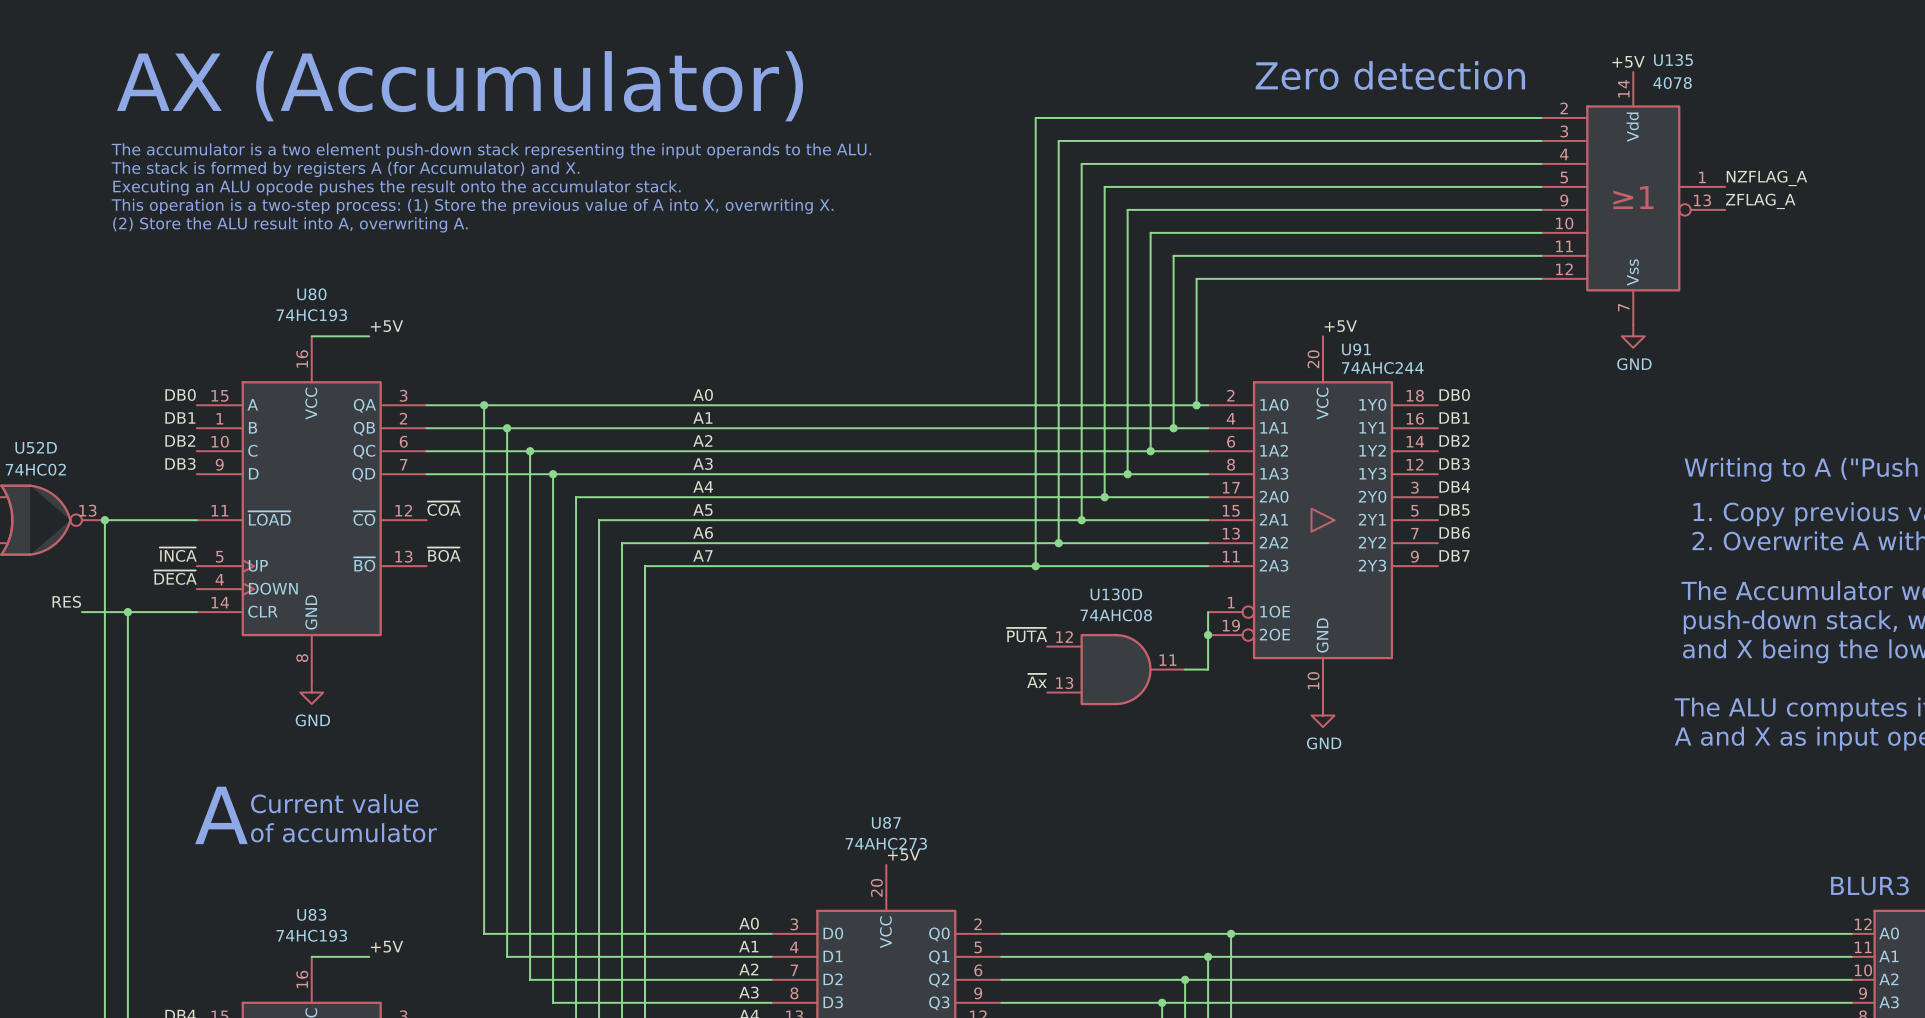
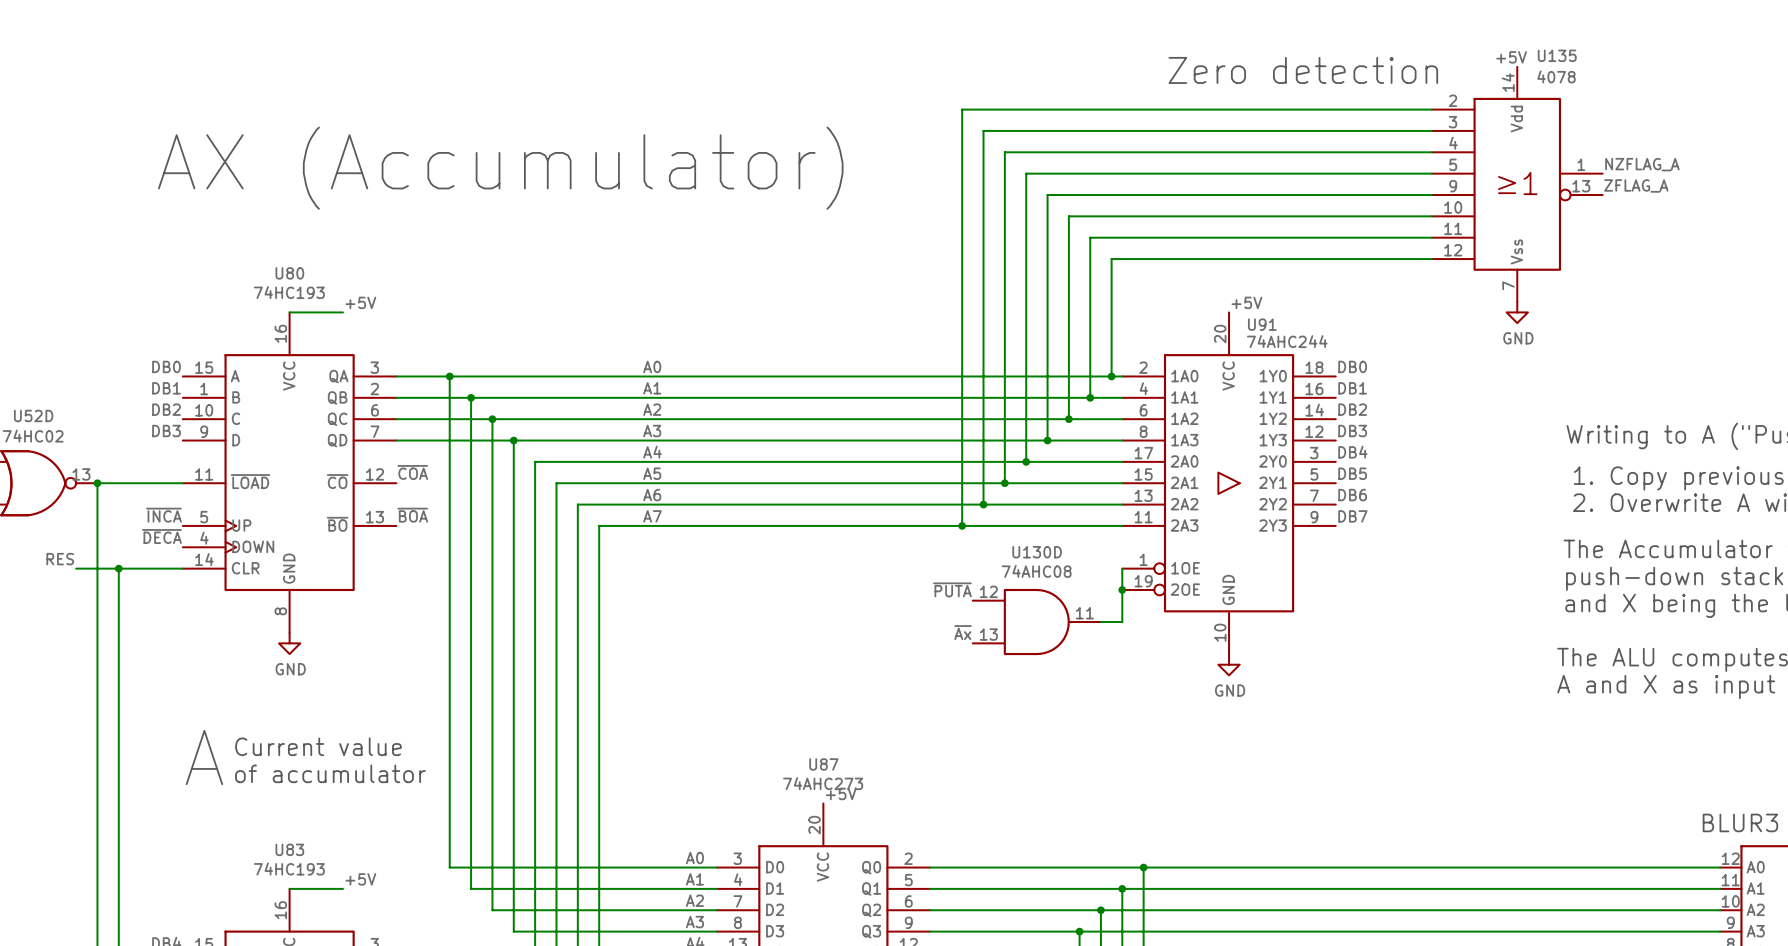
text position: AX (Accumulator) (460, 86) -> AX (Accumulator) (500, 168)
text: The accumulator is a two element push-down stack representing the input operands to the ALU. (491, 150) -> none
text: The stack is formed by registers A (for Accumulator) and X. (345, 169) -> none
text: Executing an ALU opcode pushes the result onto the accumulator stack. (396, 187) -> none
text: This operation is a two-step process: (1) Store the previous value of A into X, overwriting X. (472, 206) -> none
text: (2) Store the ALU result into A, overwriting A. (290, 224) -> none

